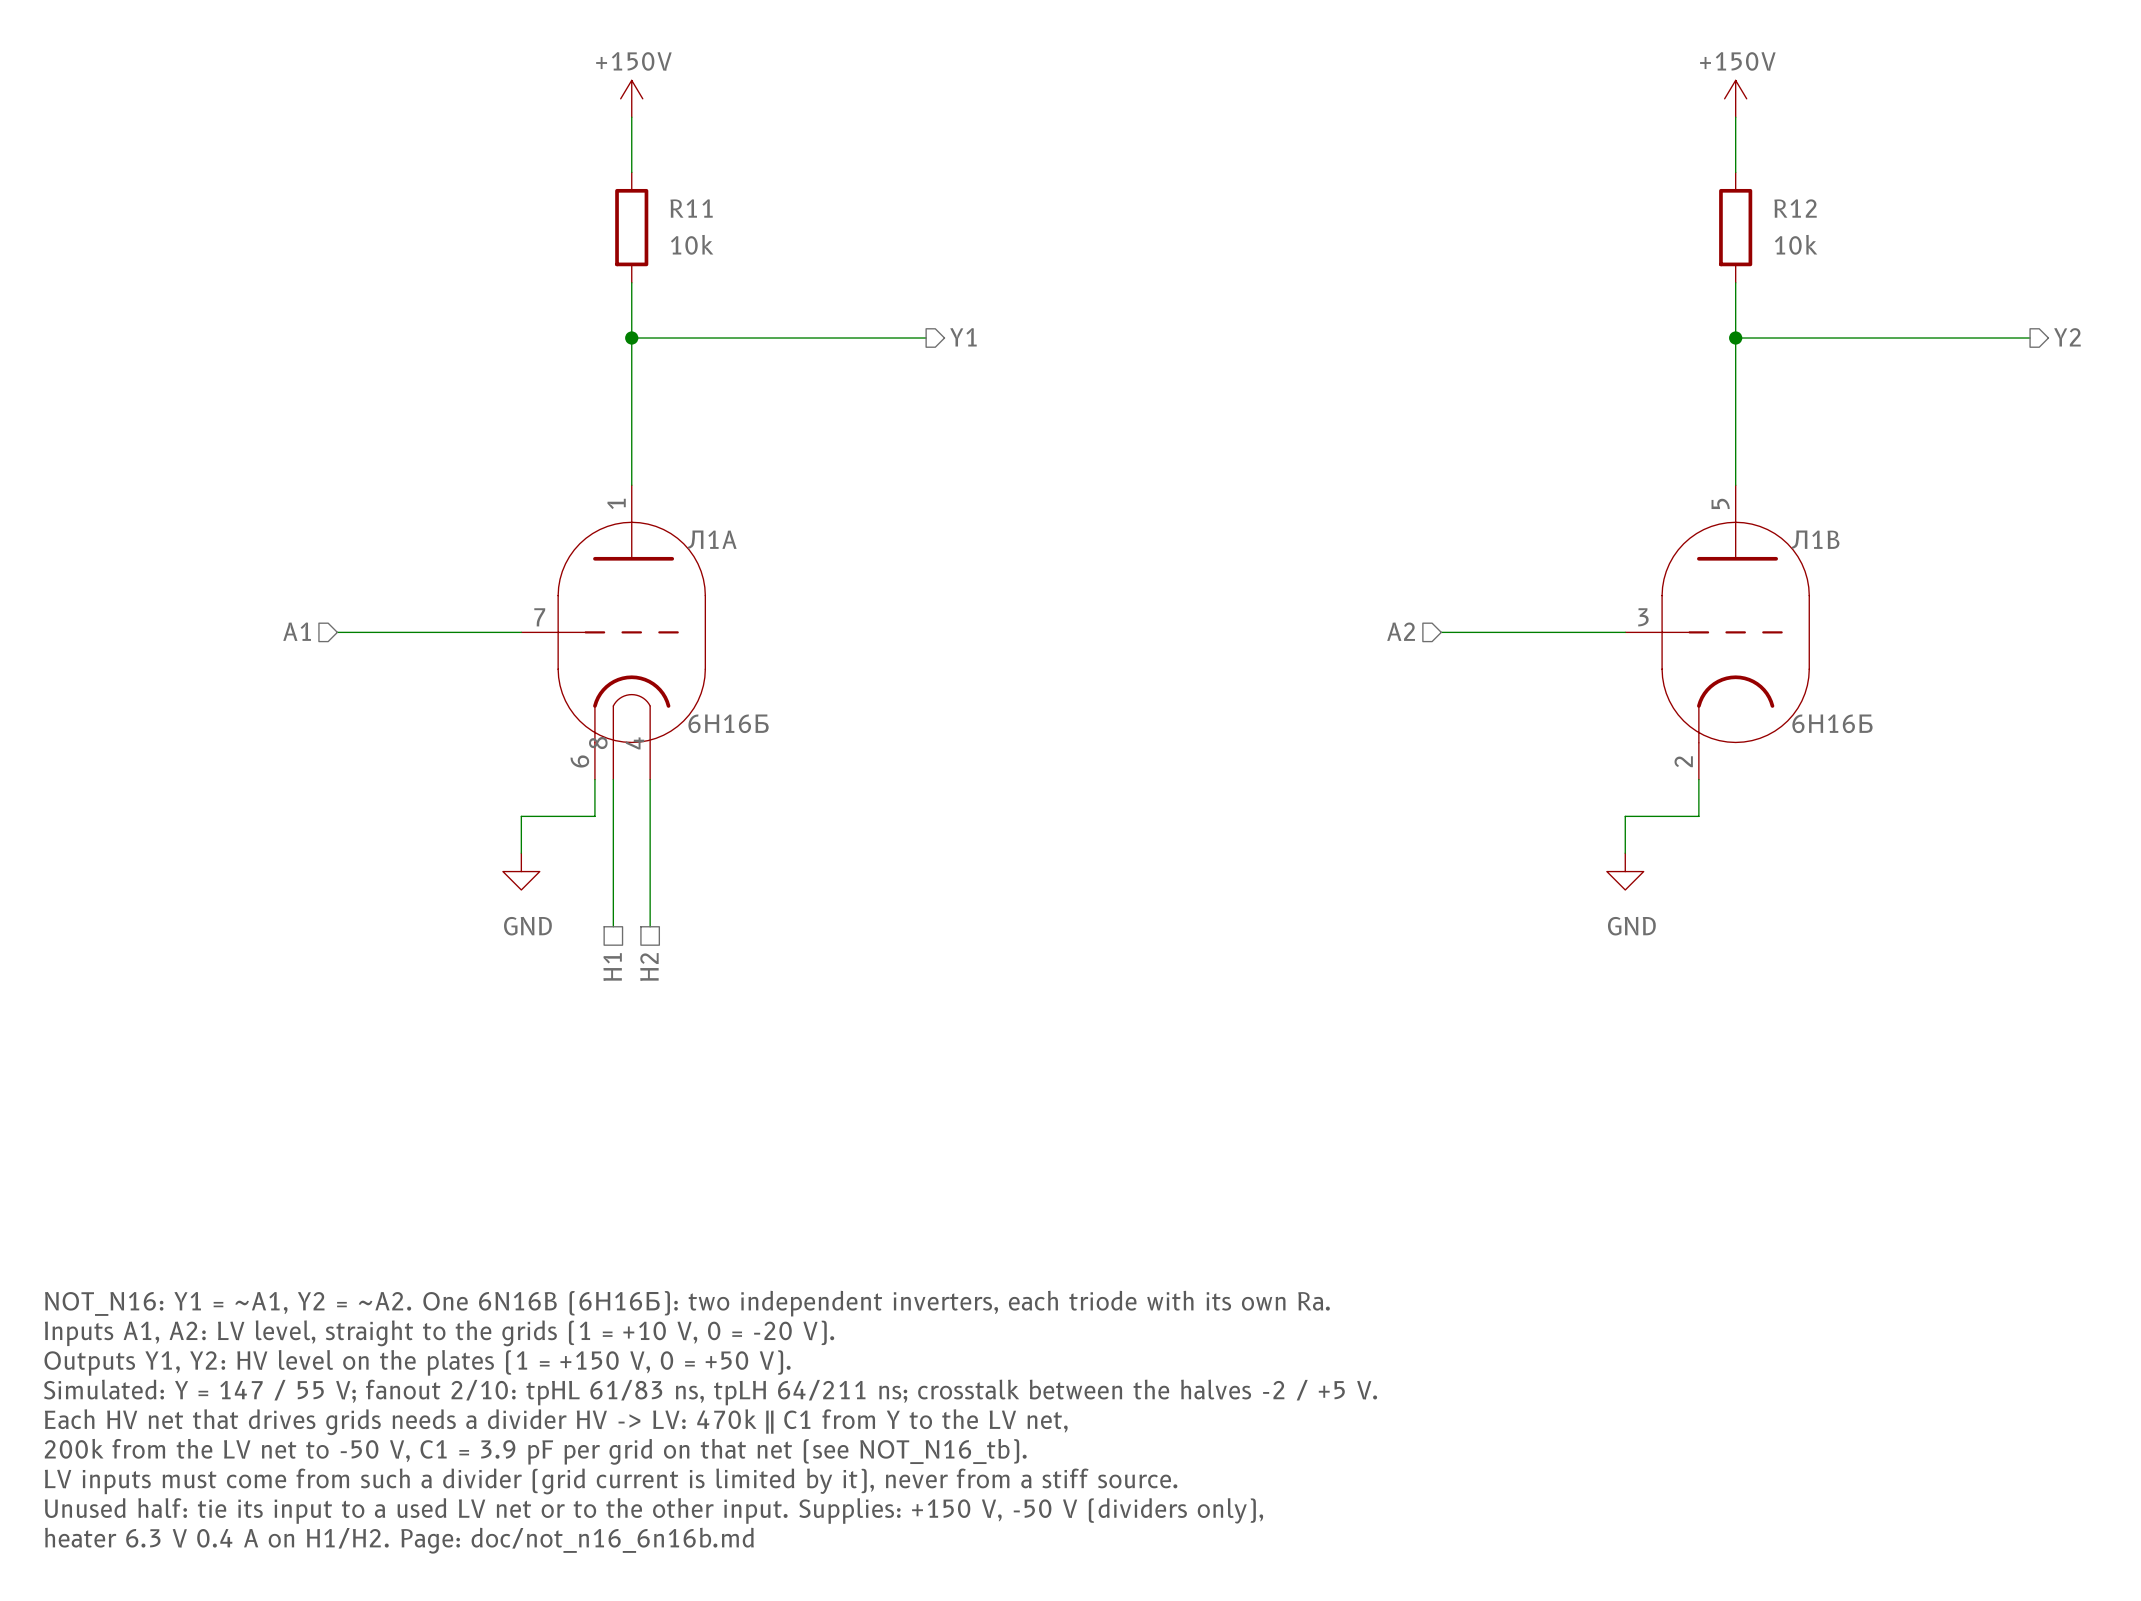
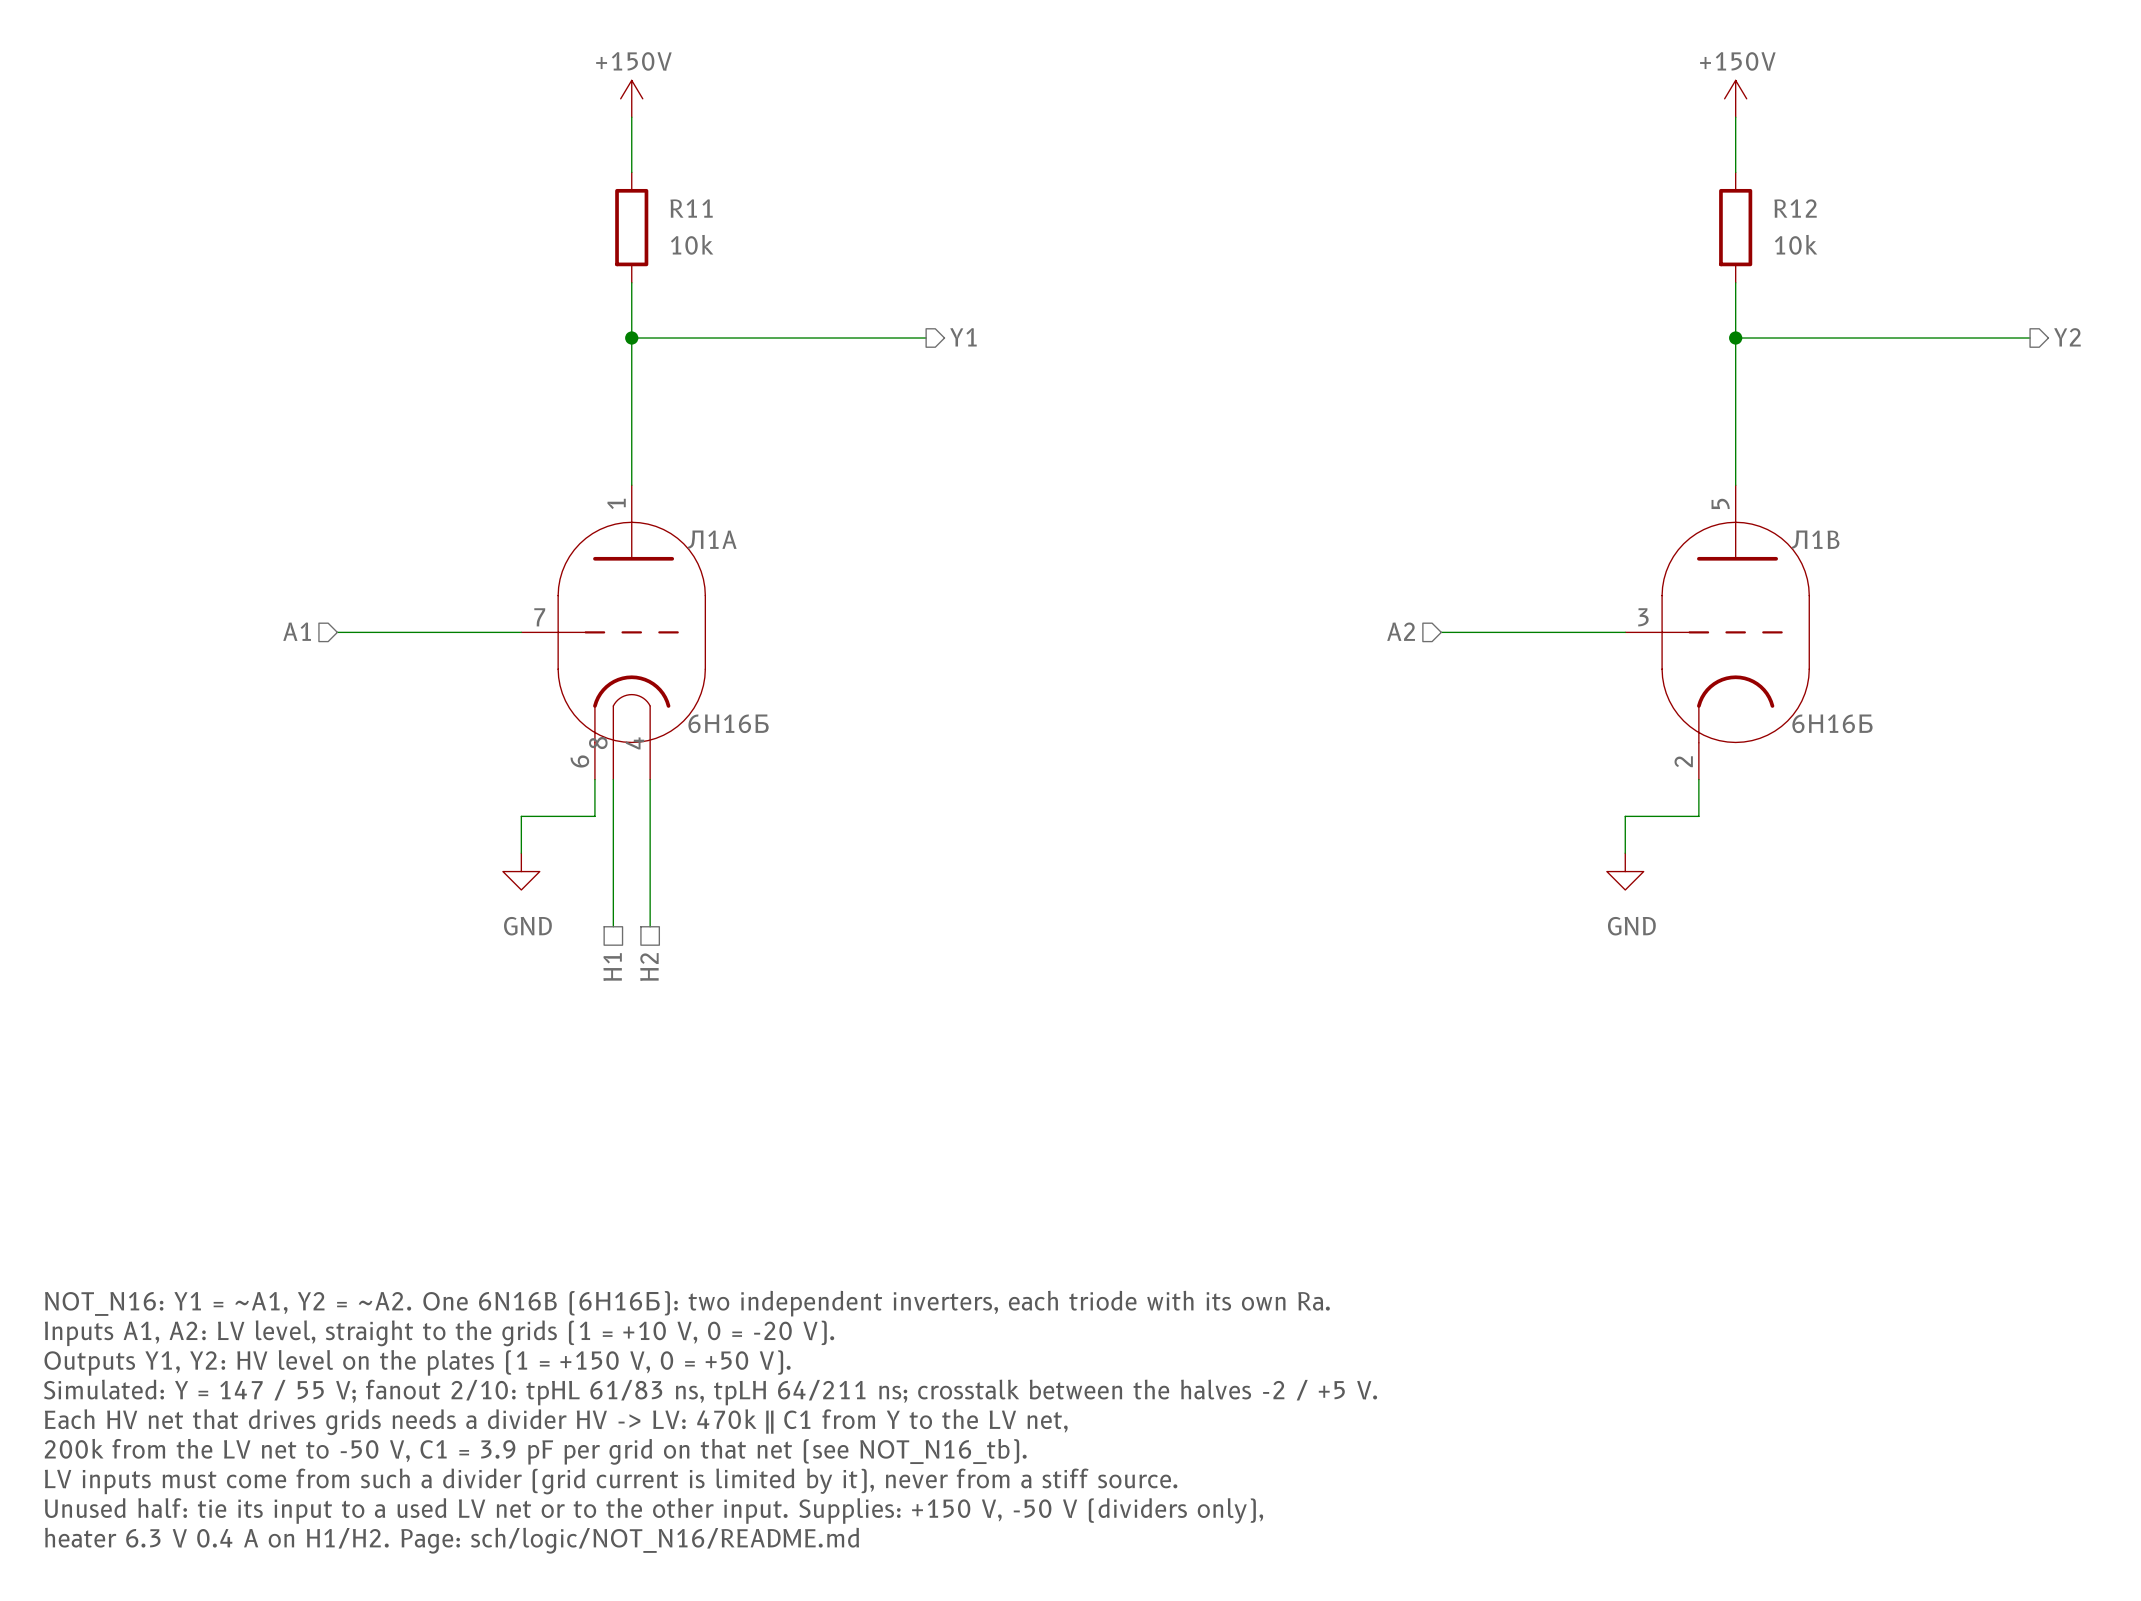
text: heater 6.3 V 0.4 A on H1/H2. Page: doc/not_n16_6n16b.md (399, 1540) -> heater 6.3 V 0.4 A on H1/H2. Page: sch/logic/NOT_N16/README.md (452, 1540)

